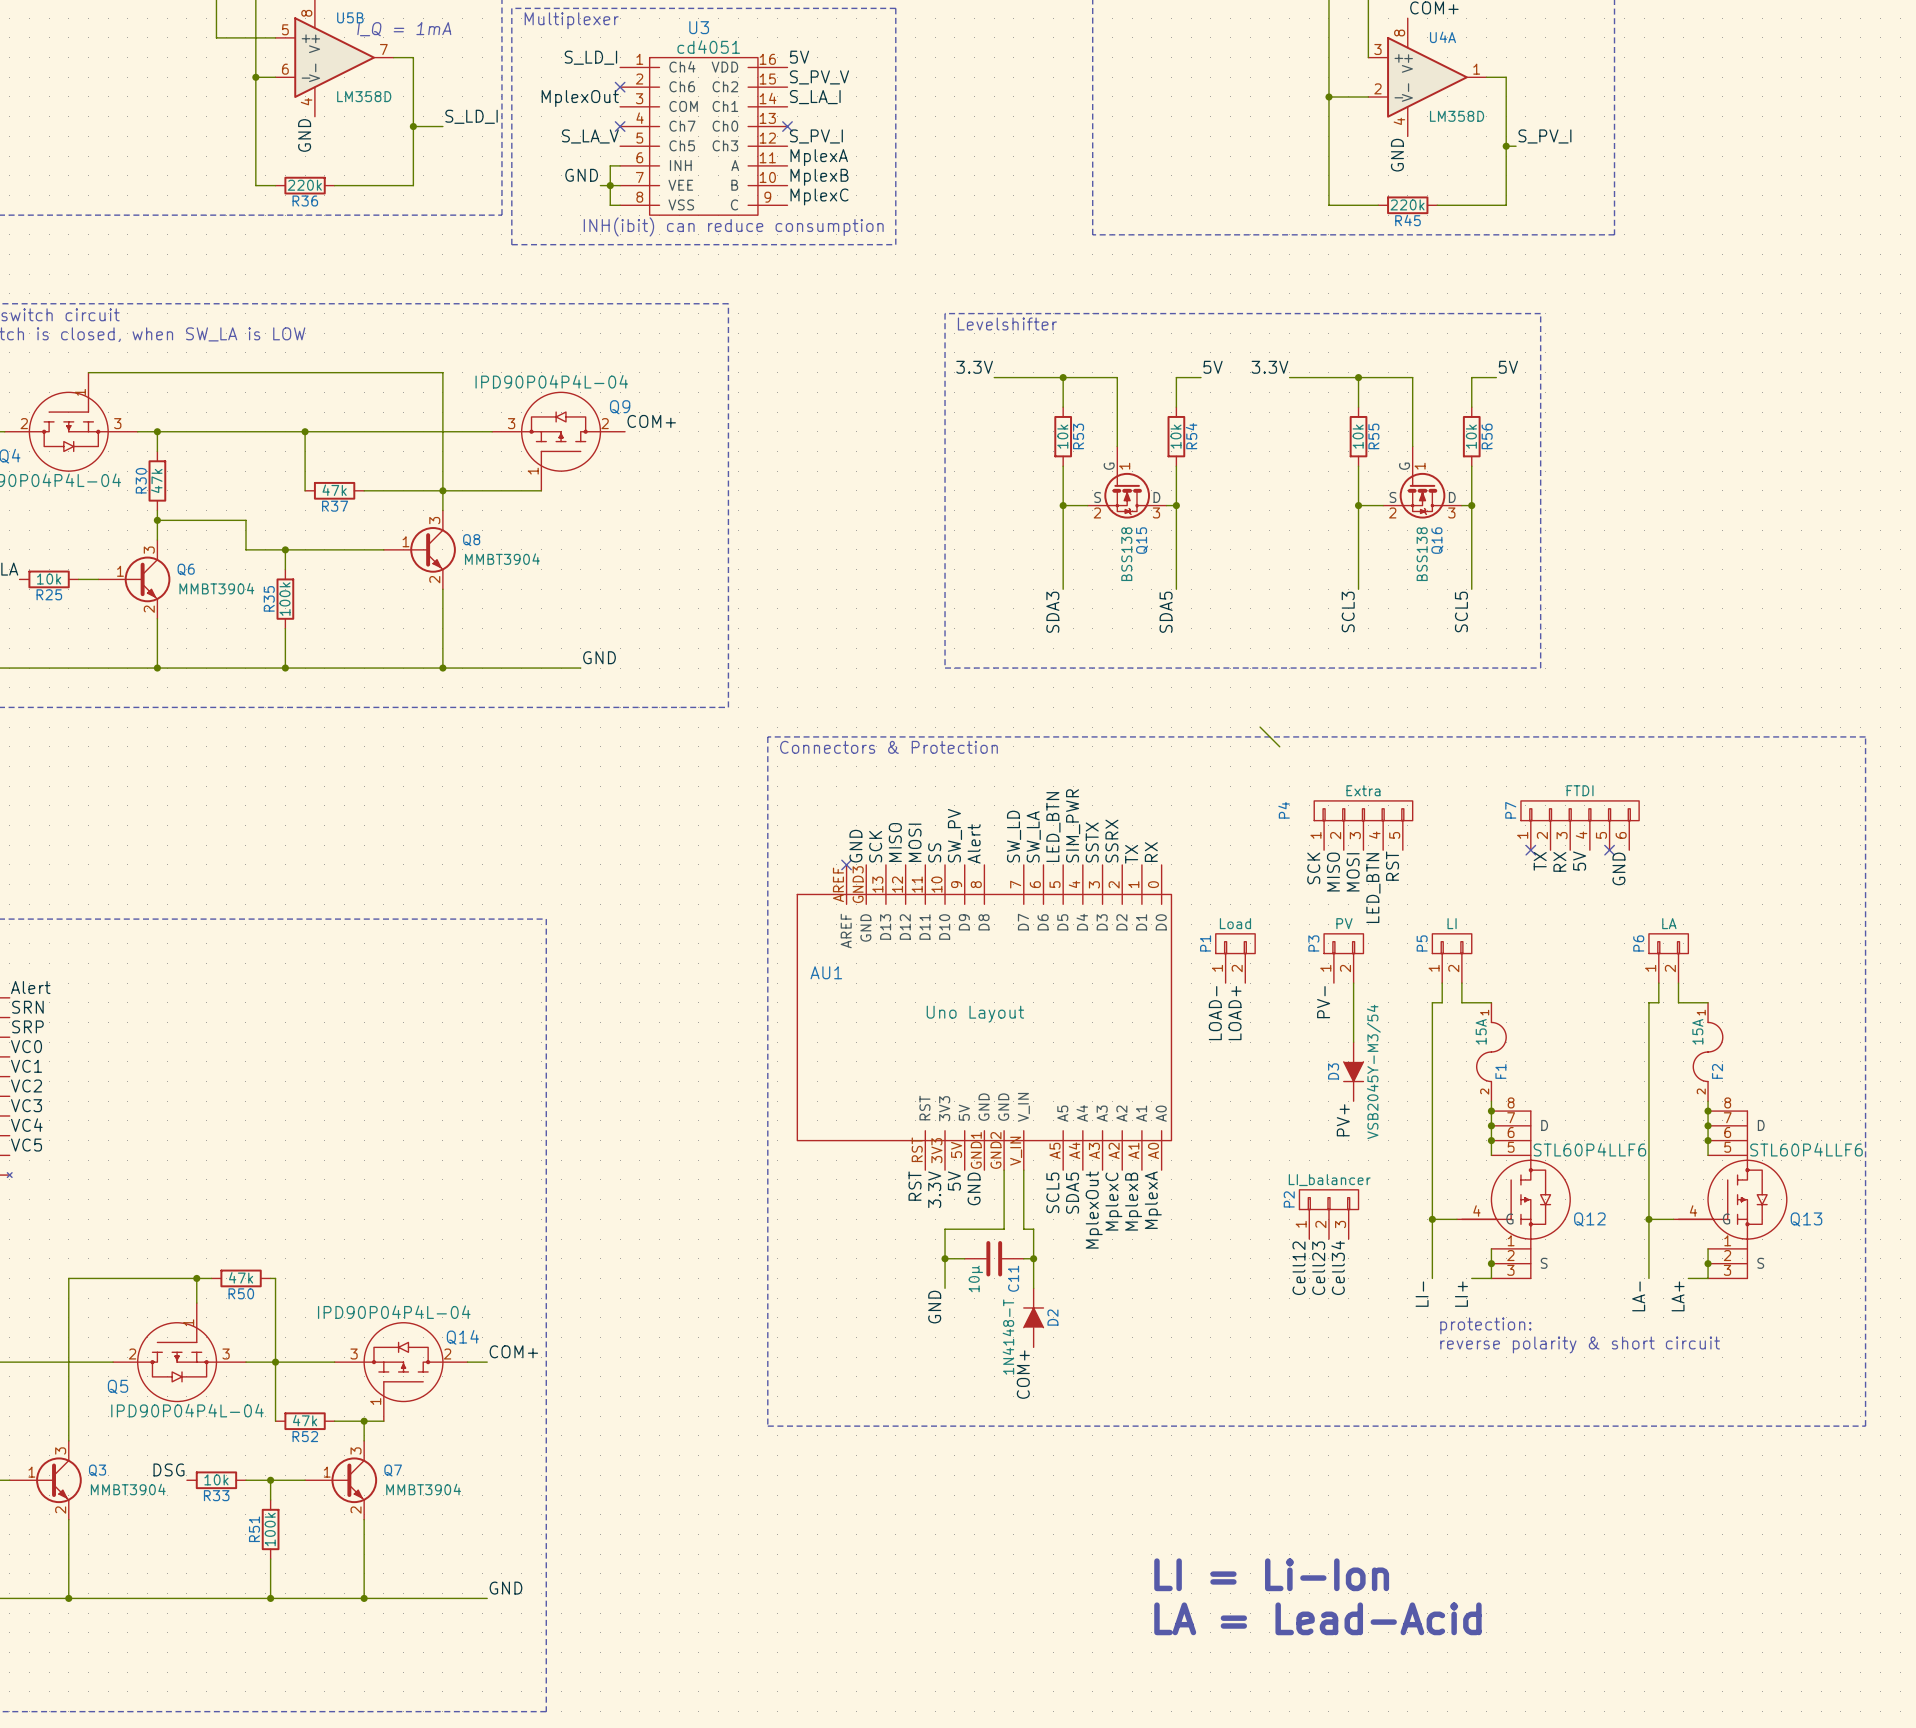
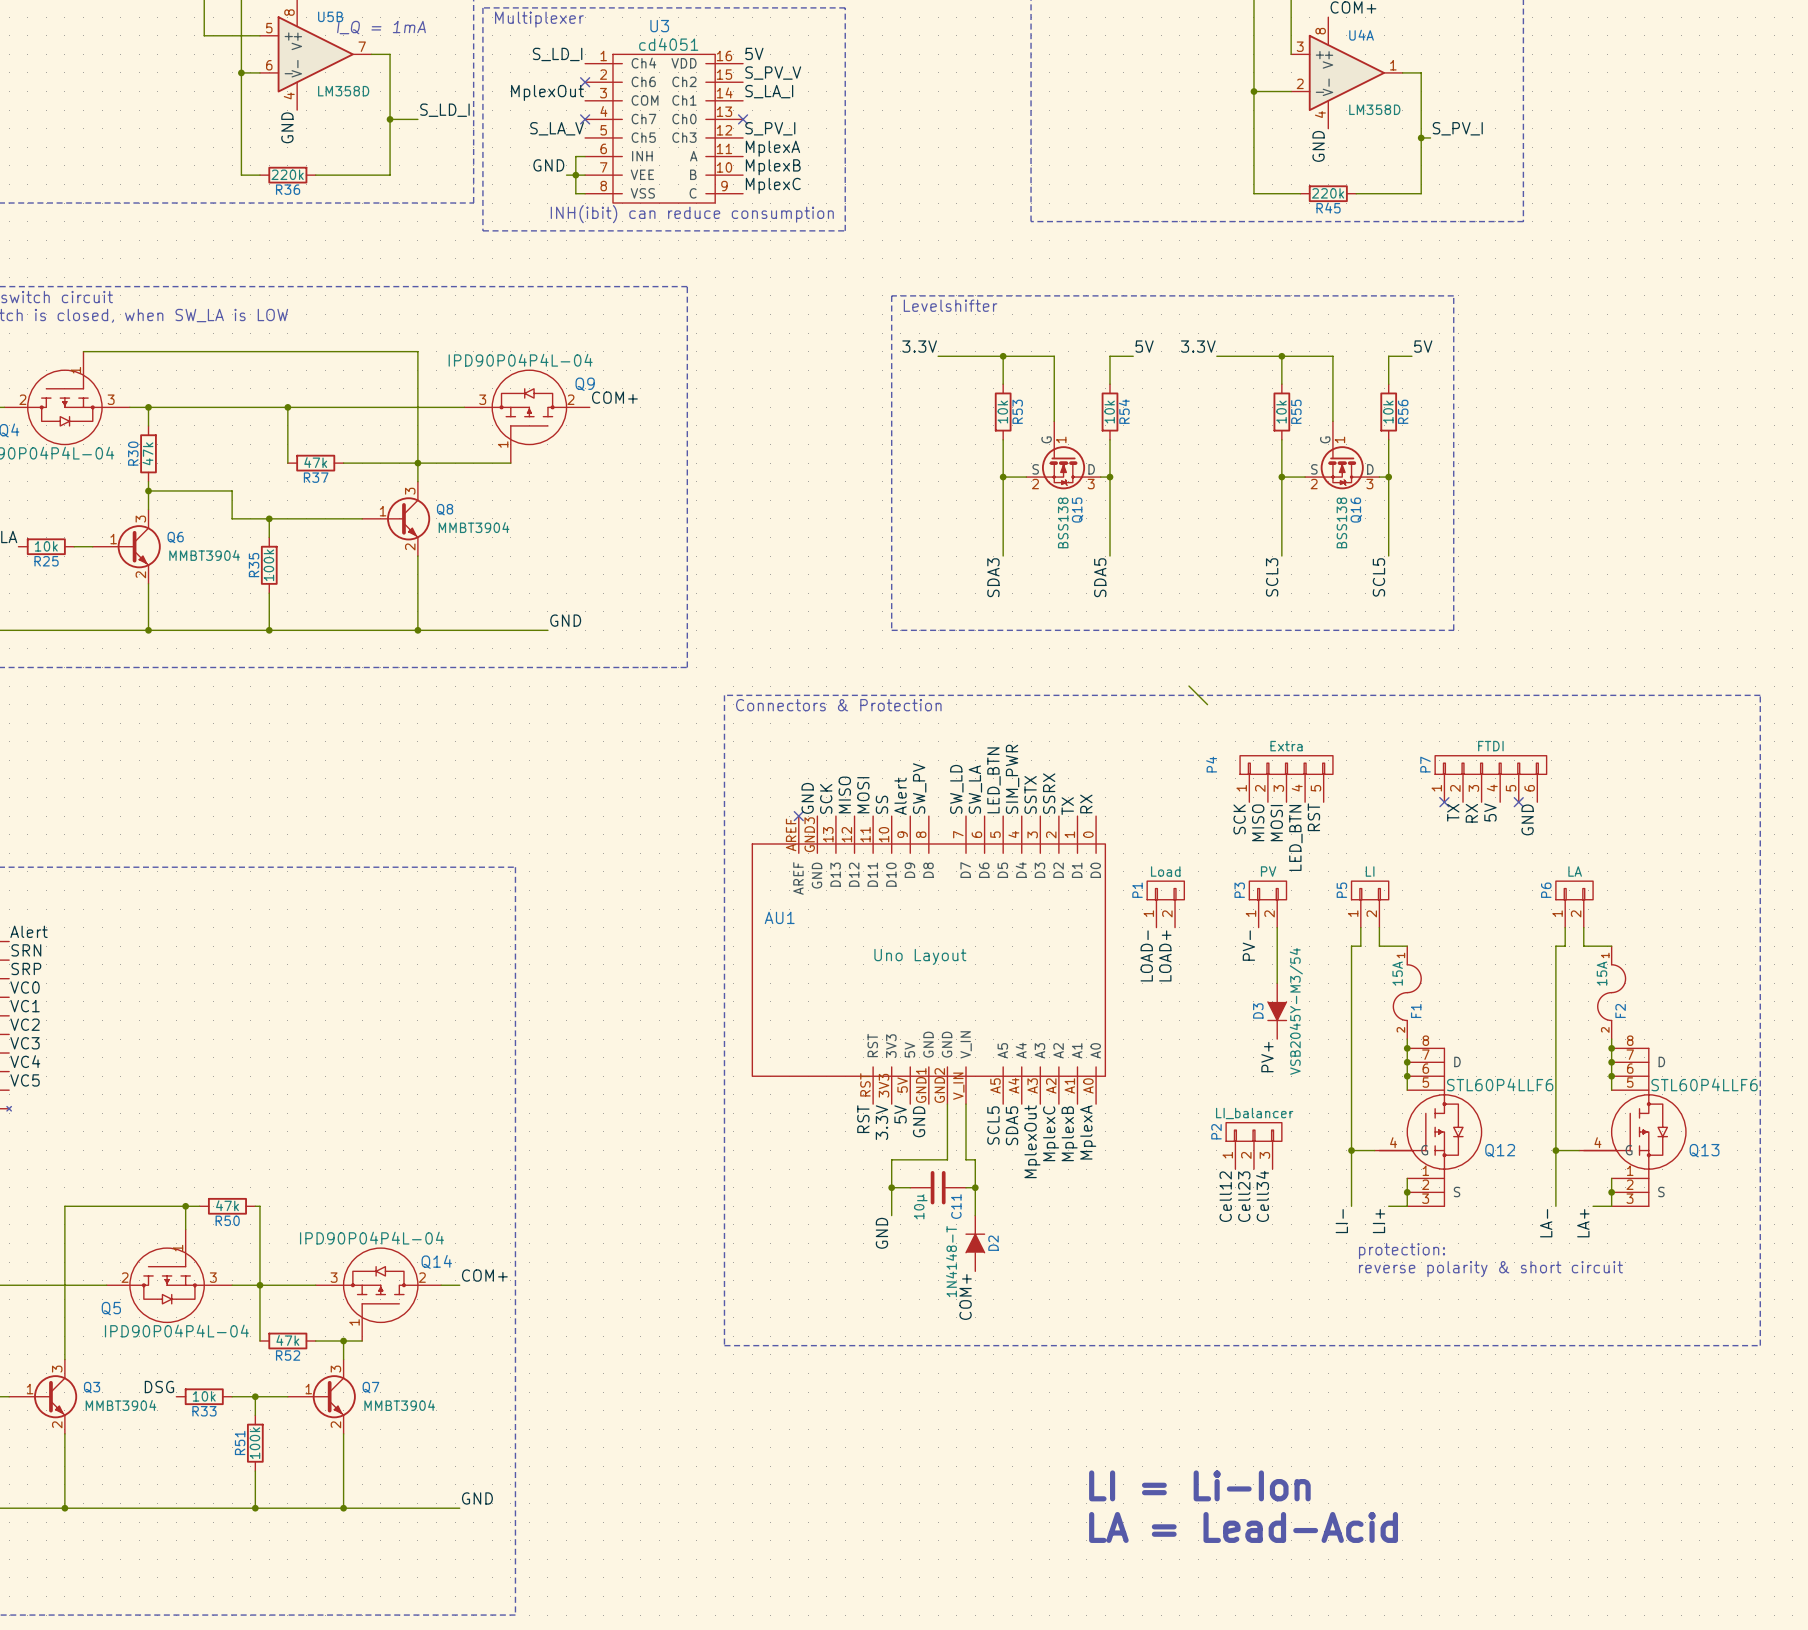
label: SW_PV (954, 835) -> Alert (900, 796)
label: Alert (974, 843) -> SW_PV (919, 788)

